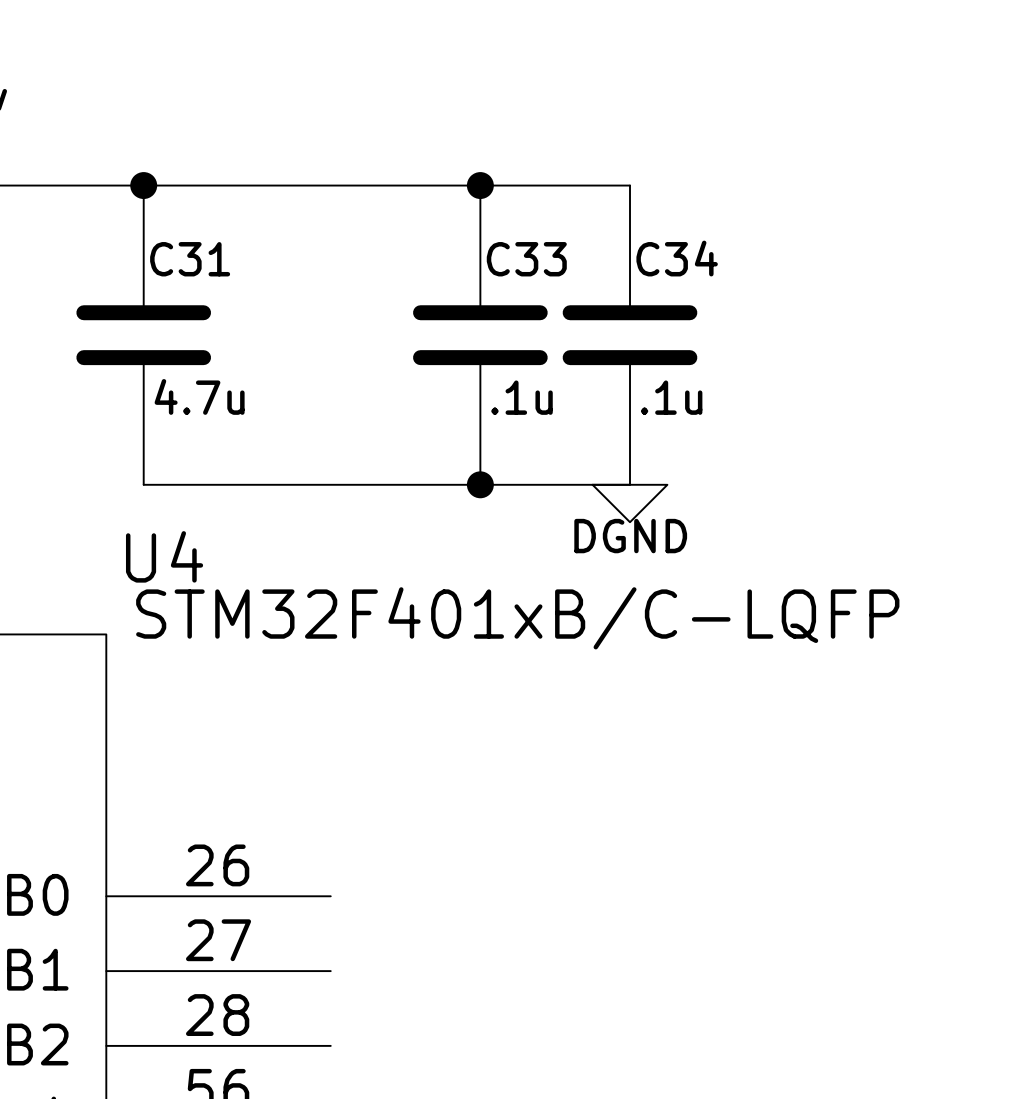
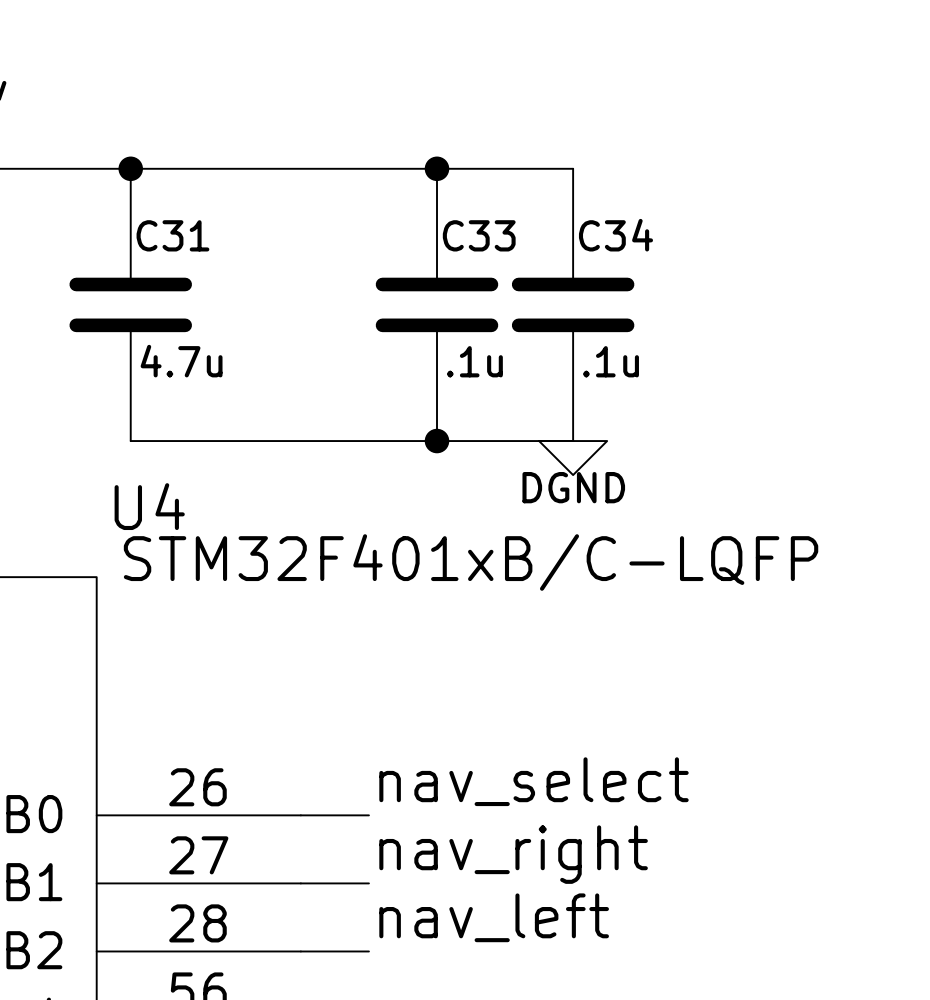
label: none -> nav_select (534, 781)
wire: none -> (300, 815) (368, 815)
label: none -> nav_right (513, 854)
wire: none -> (300, 883) (368, 883)
label: none -> nav_left (494, 917)
wire: none -> (300, 951) (368, 951)

